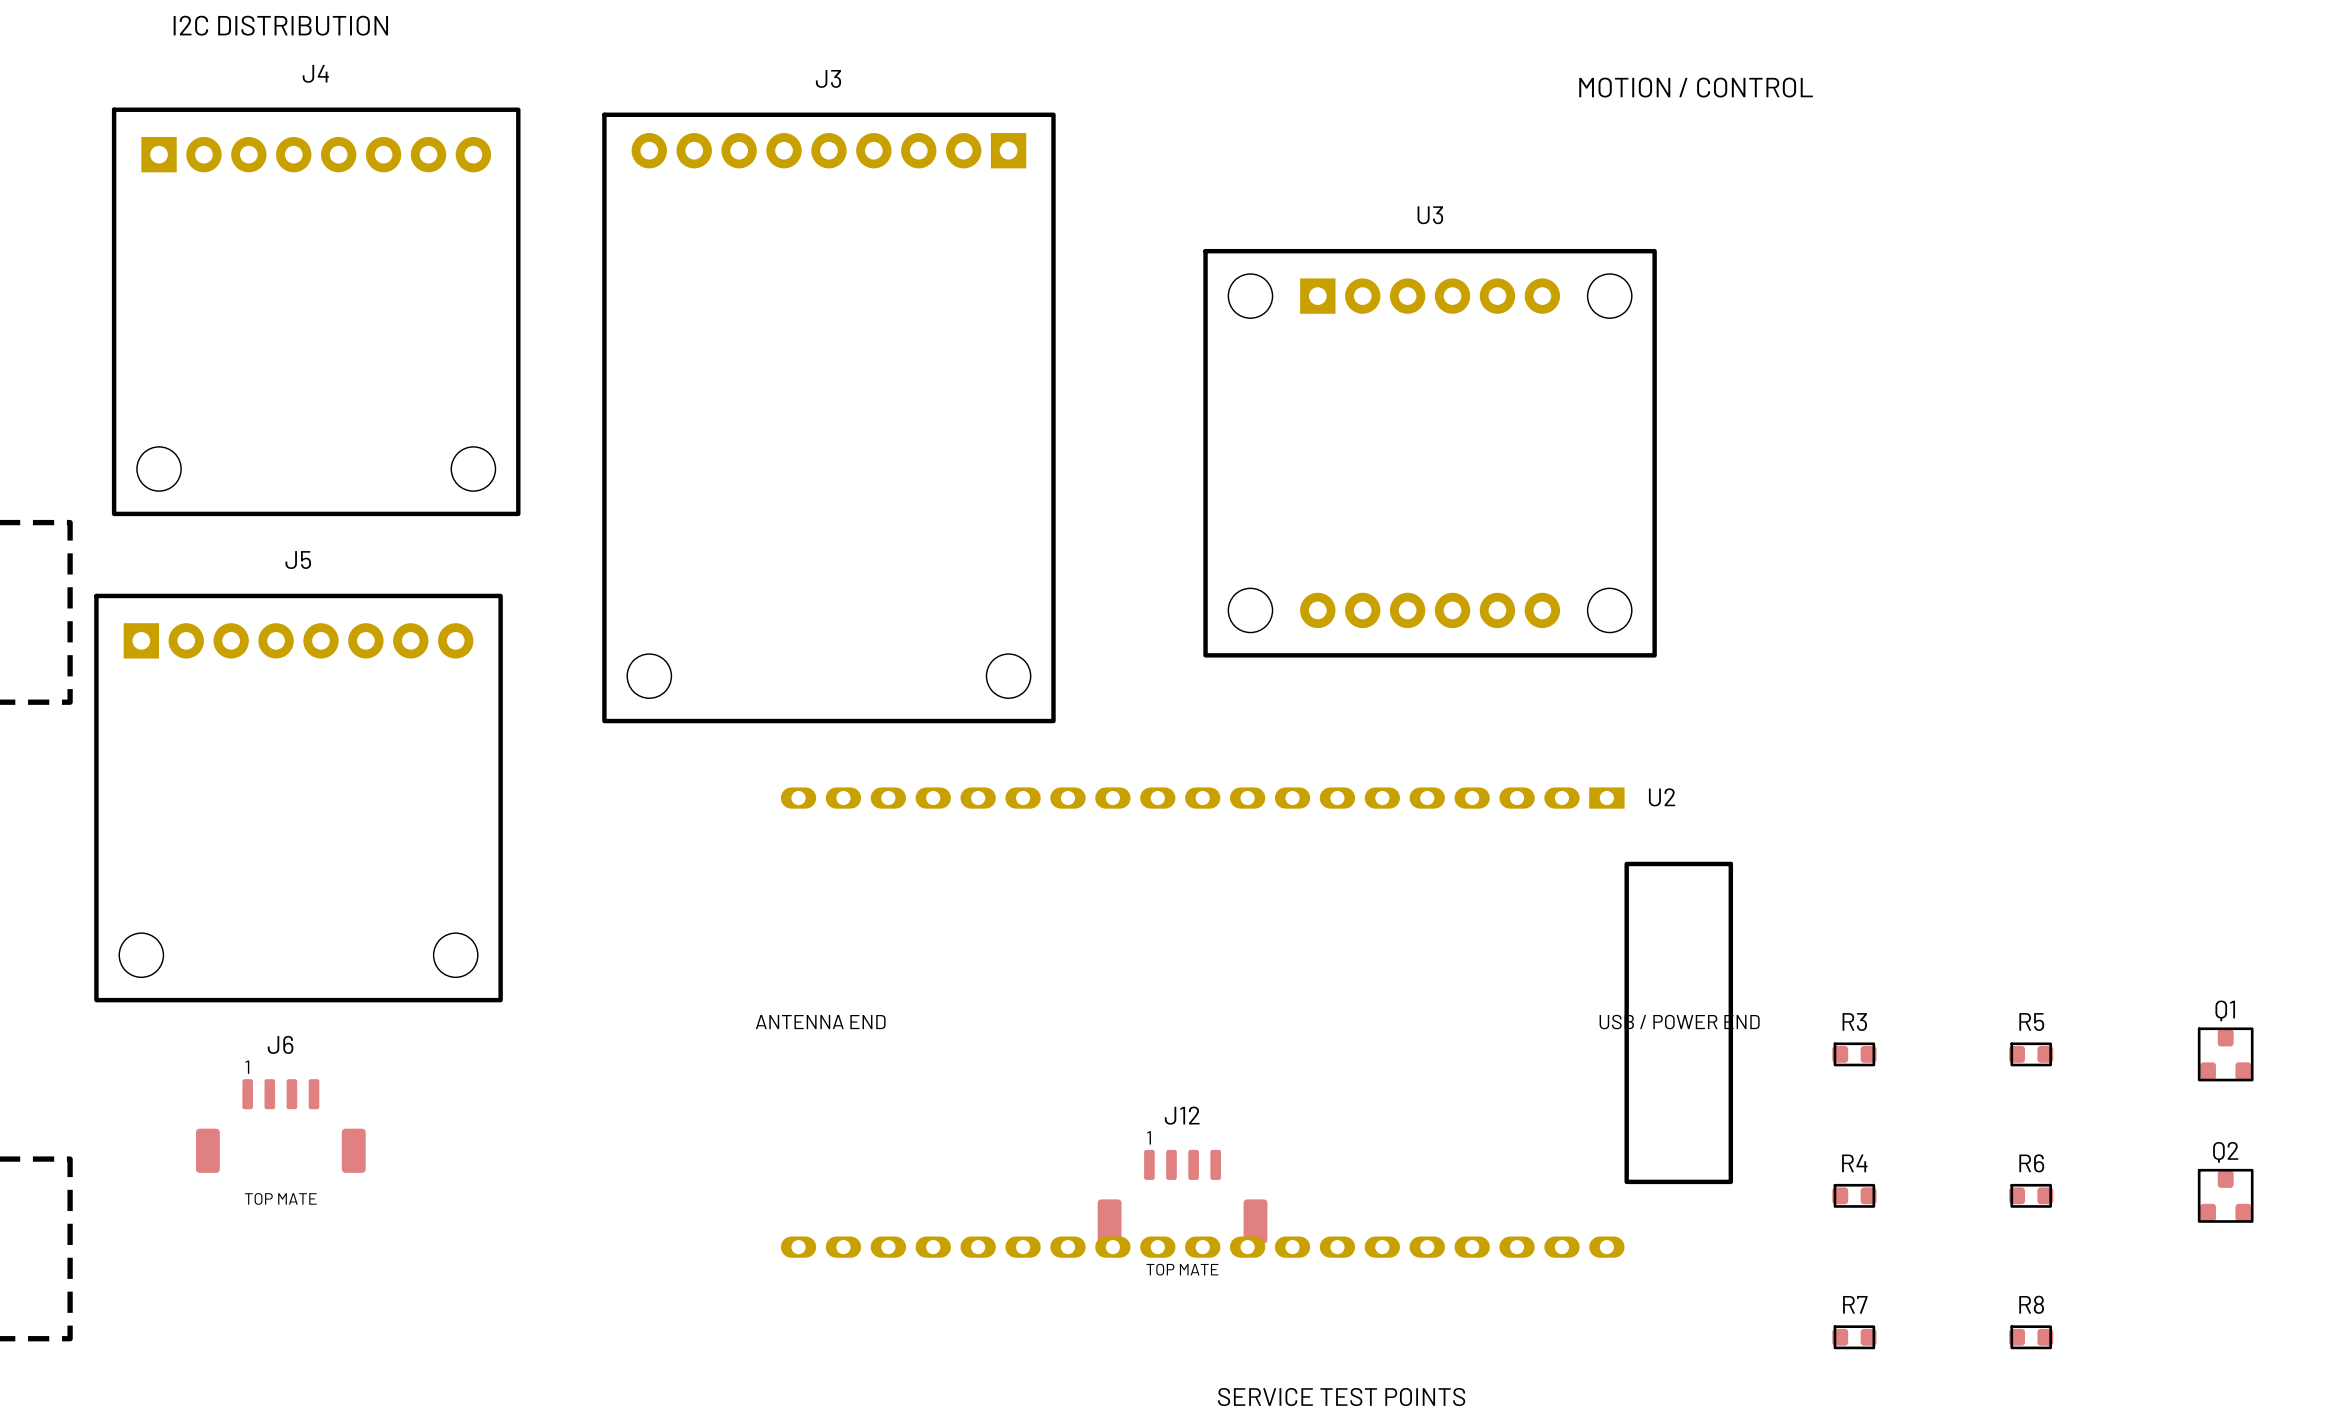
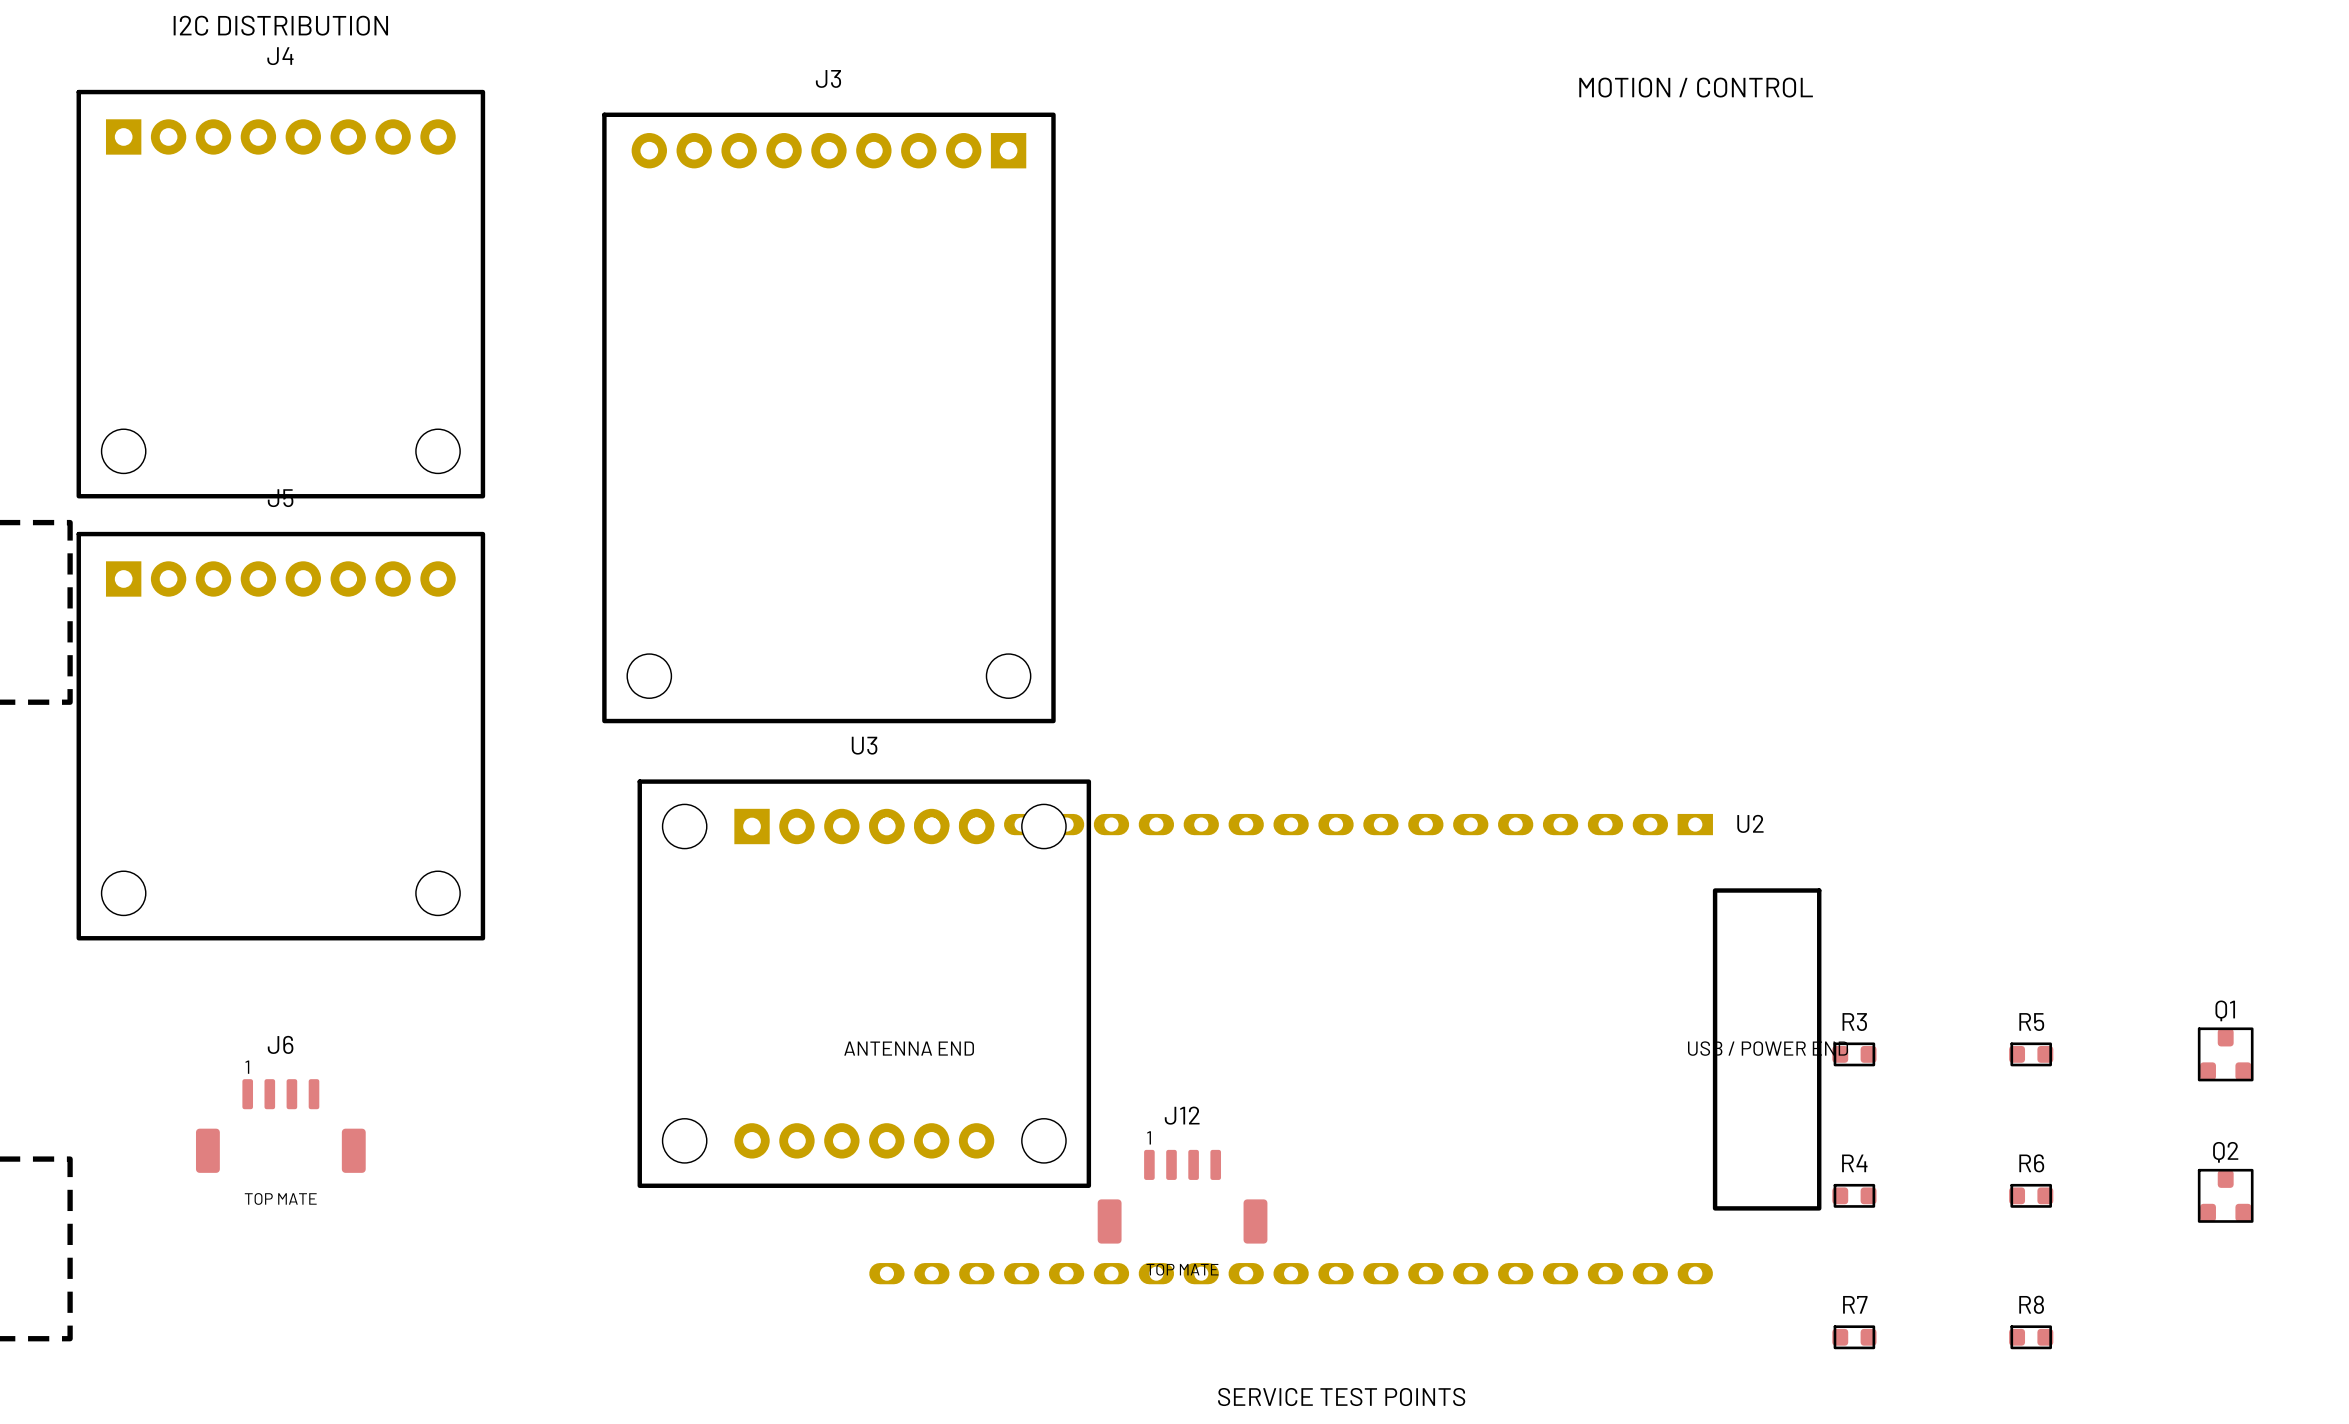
J4 position: (316, 311) -> (280, 294)
U3 position: (1430, 453) -> (864, 983)
J5 position: (298, 798) -> (280, 736)
U2 position: (1256, 1022) -> (1345, 1049)

